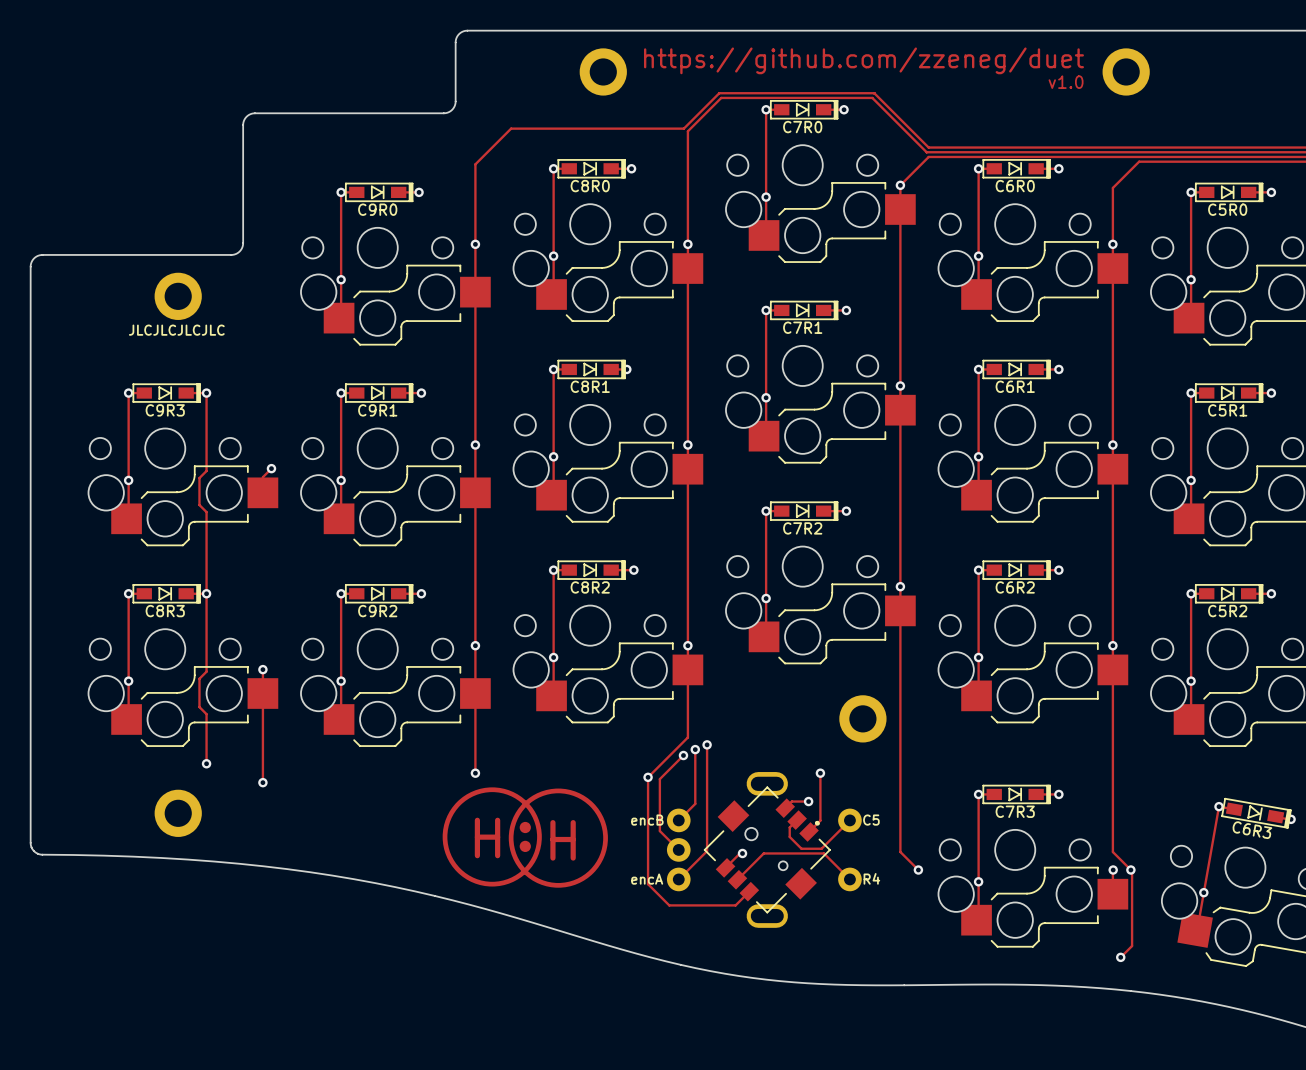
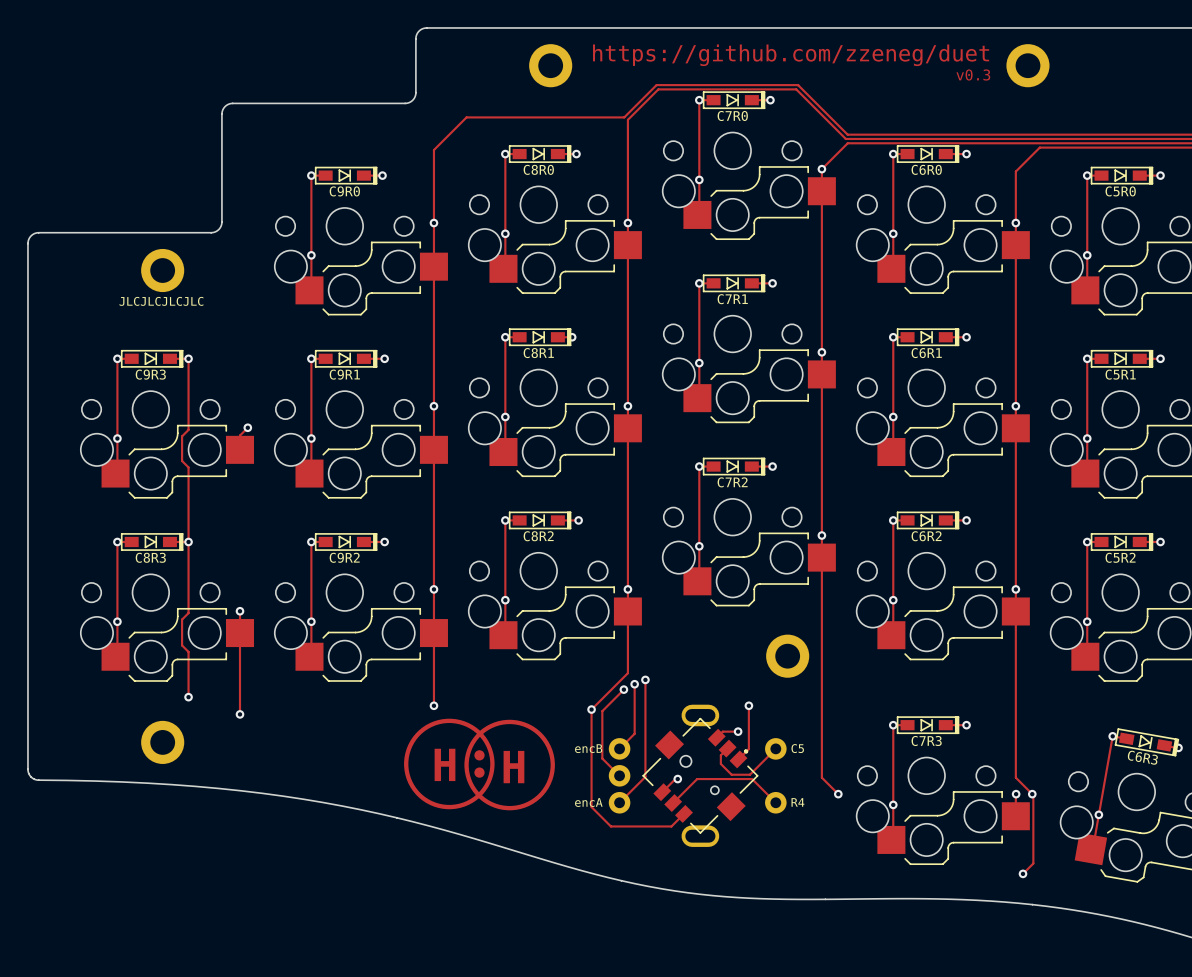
text: v1.0 (1066, 82) -> v0.3 (973, 75)

